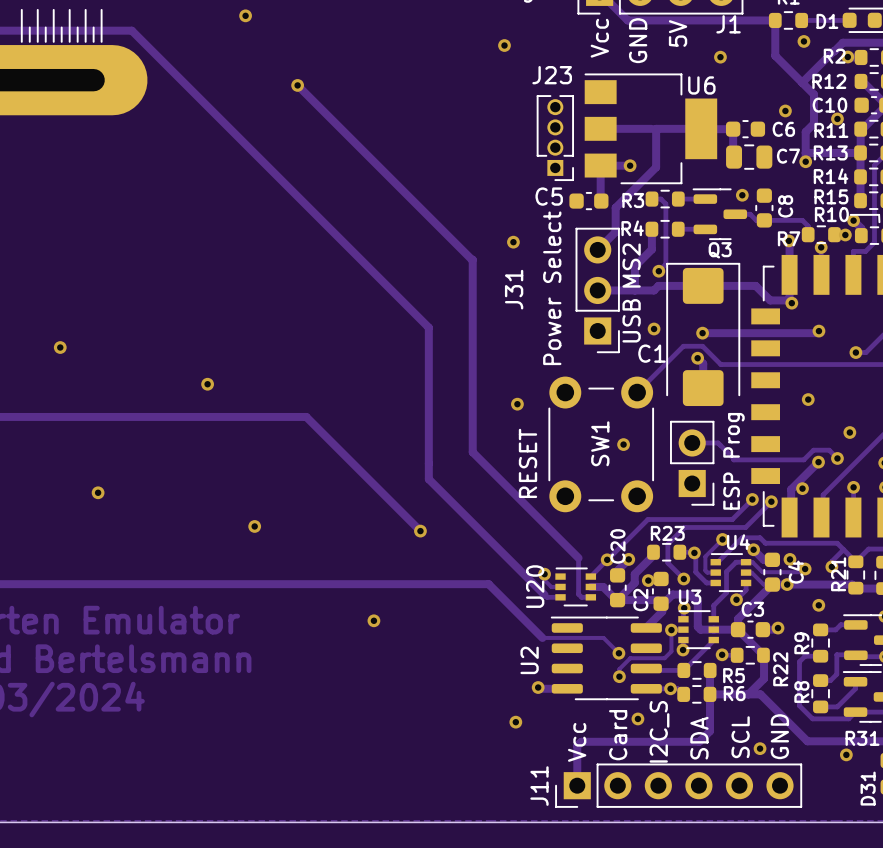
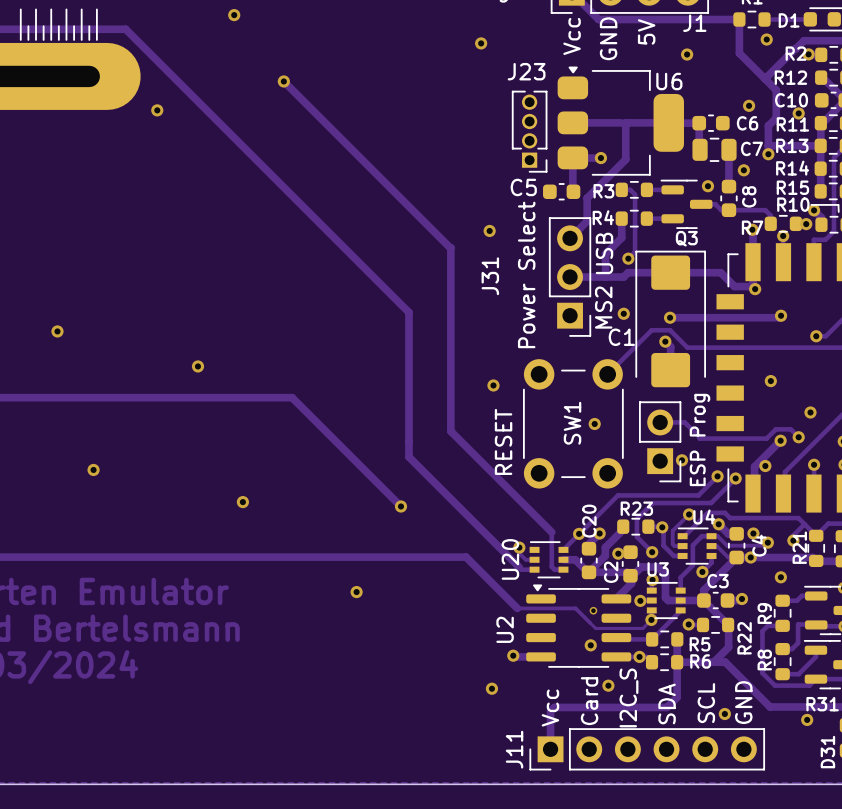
U6 footprint: [584, 73, 718, 185] -> [557, 66, 684, 176]
via: none -> (157, 110)
track: none -> (728, 149) (728, 186)
via: none -> (743, 170)
text: MS2 (631, 265) -> USB (604, 253)
text: USB (631, 320) -> MS2 (603, 307)
via: none -> (681, 460)
U2 footprint: [550, 616, 662, 701] -> [526, 584, 632, 668]
track: (671, 630) (671, 651) (664, 658) (630, 658) (619, 669) (619, 676) -> none
via: none -> (593, 610)
track: none -> (651, 619) (642, 628) (595, 628) (590, 623)
via: (618, 653) -> none

